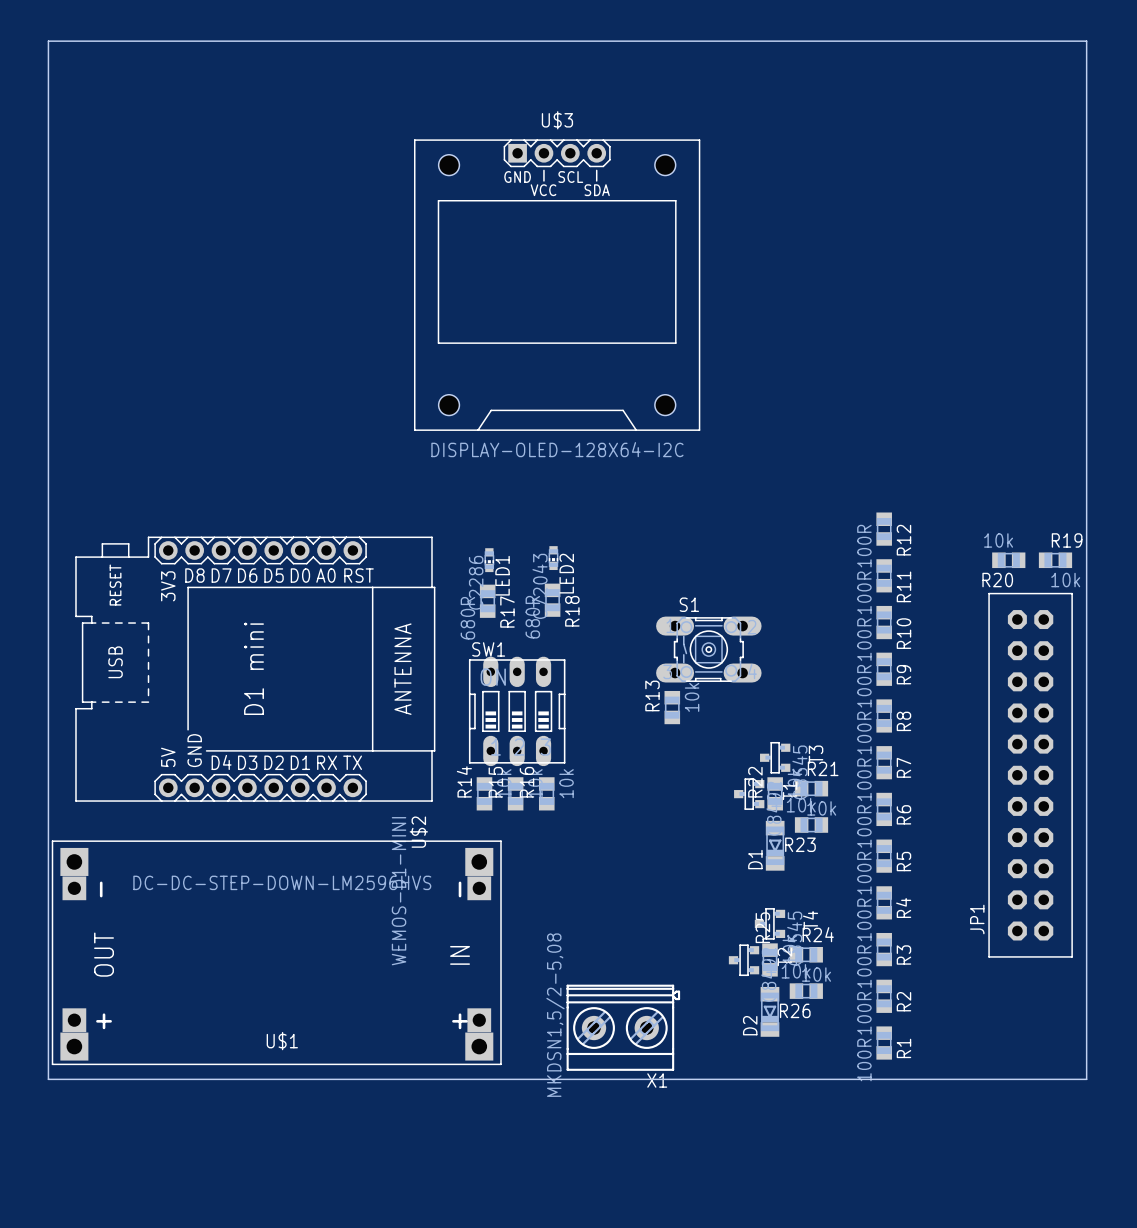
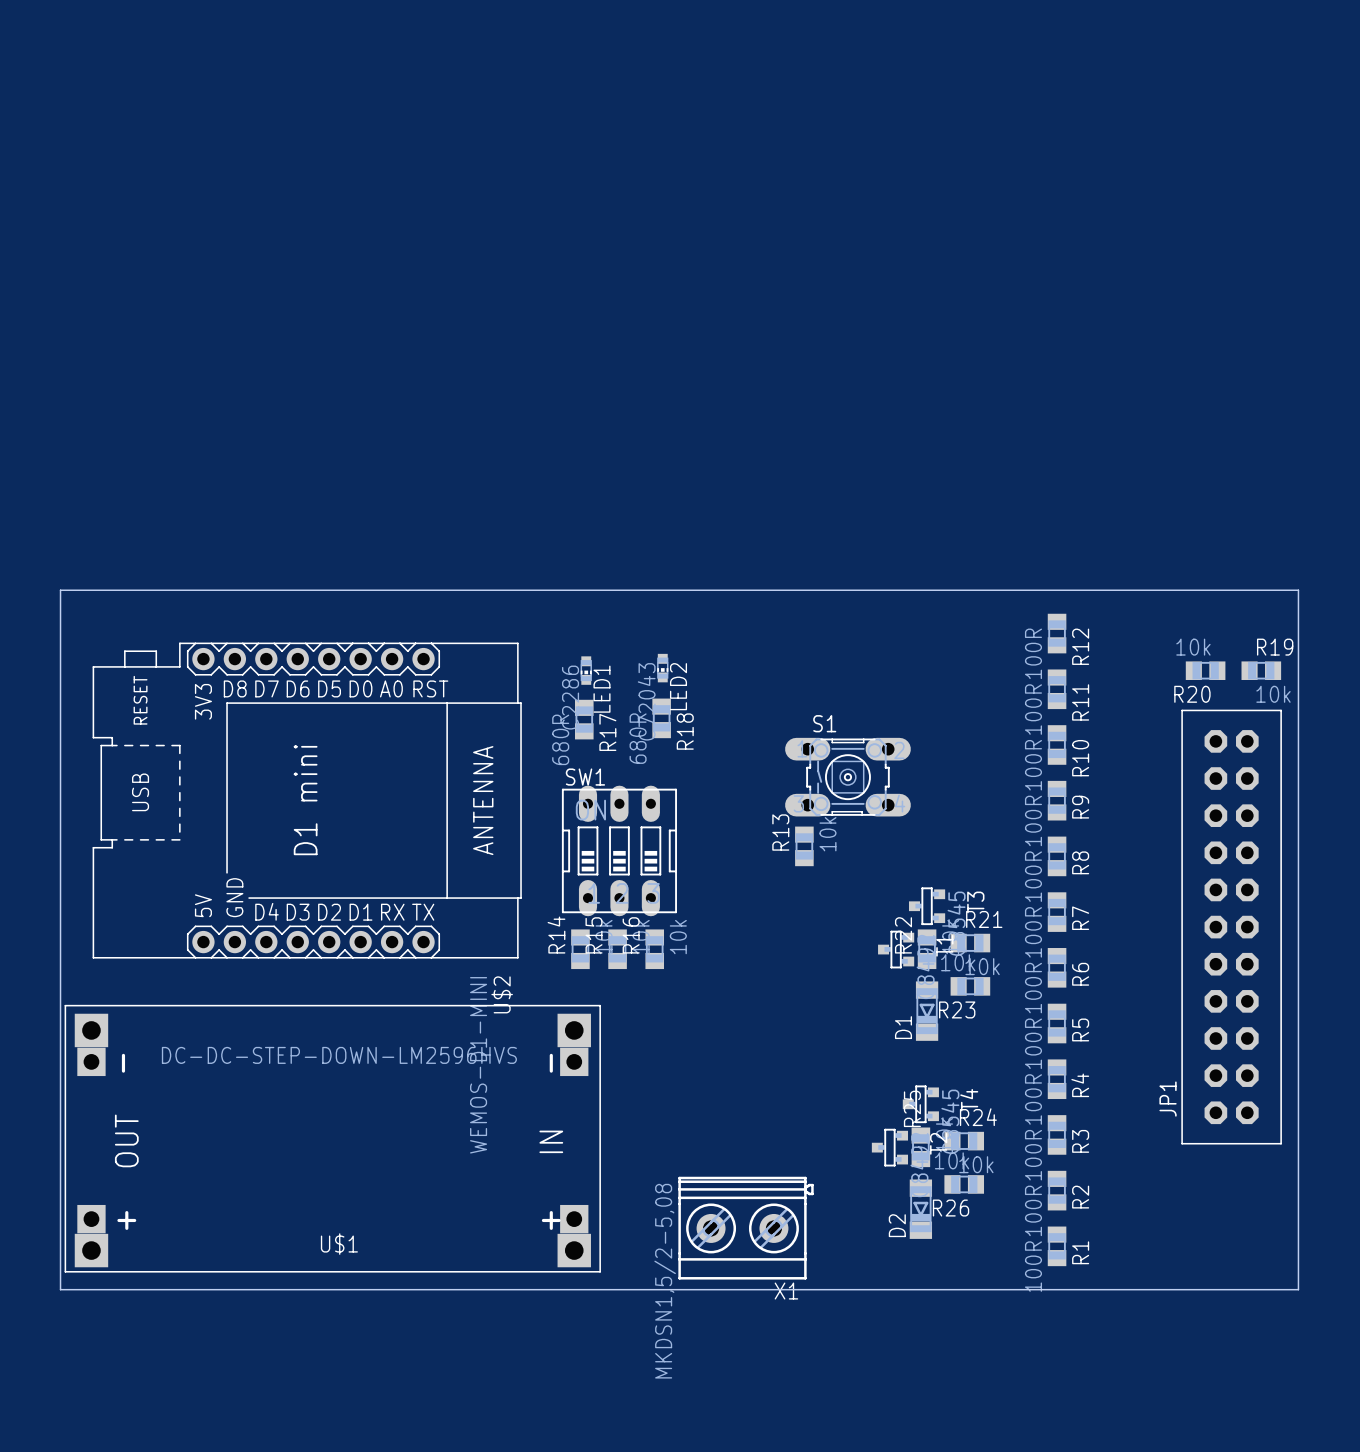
U$3: DISPLAY-OLED-128X64-I2C (557, 285) -> none
board edge: (48, 492) (48, 41) (1086, 41) (1086, 492) -> (60, 590) (1298, 590)
X1 value position: MKDSN1,5/2-5,08 (555, 1015) -> MKDSN1,5/2-5,08 (665, 1281)

